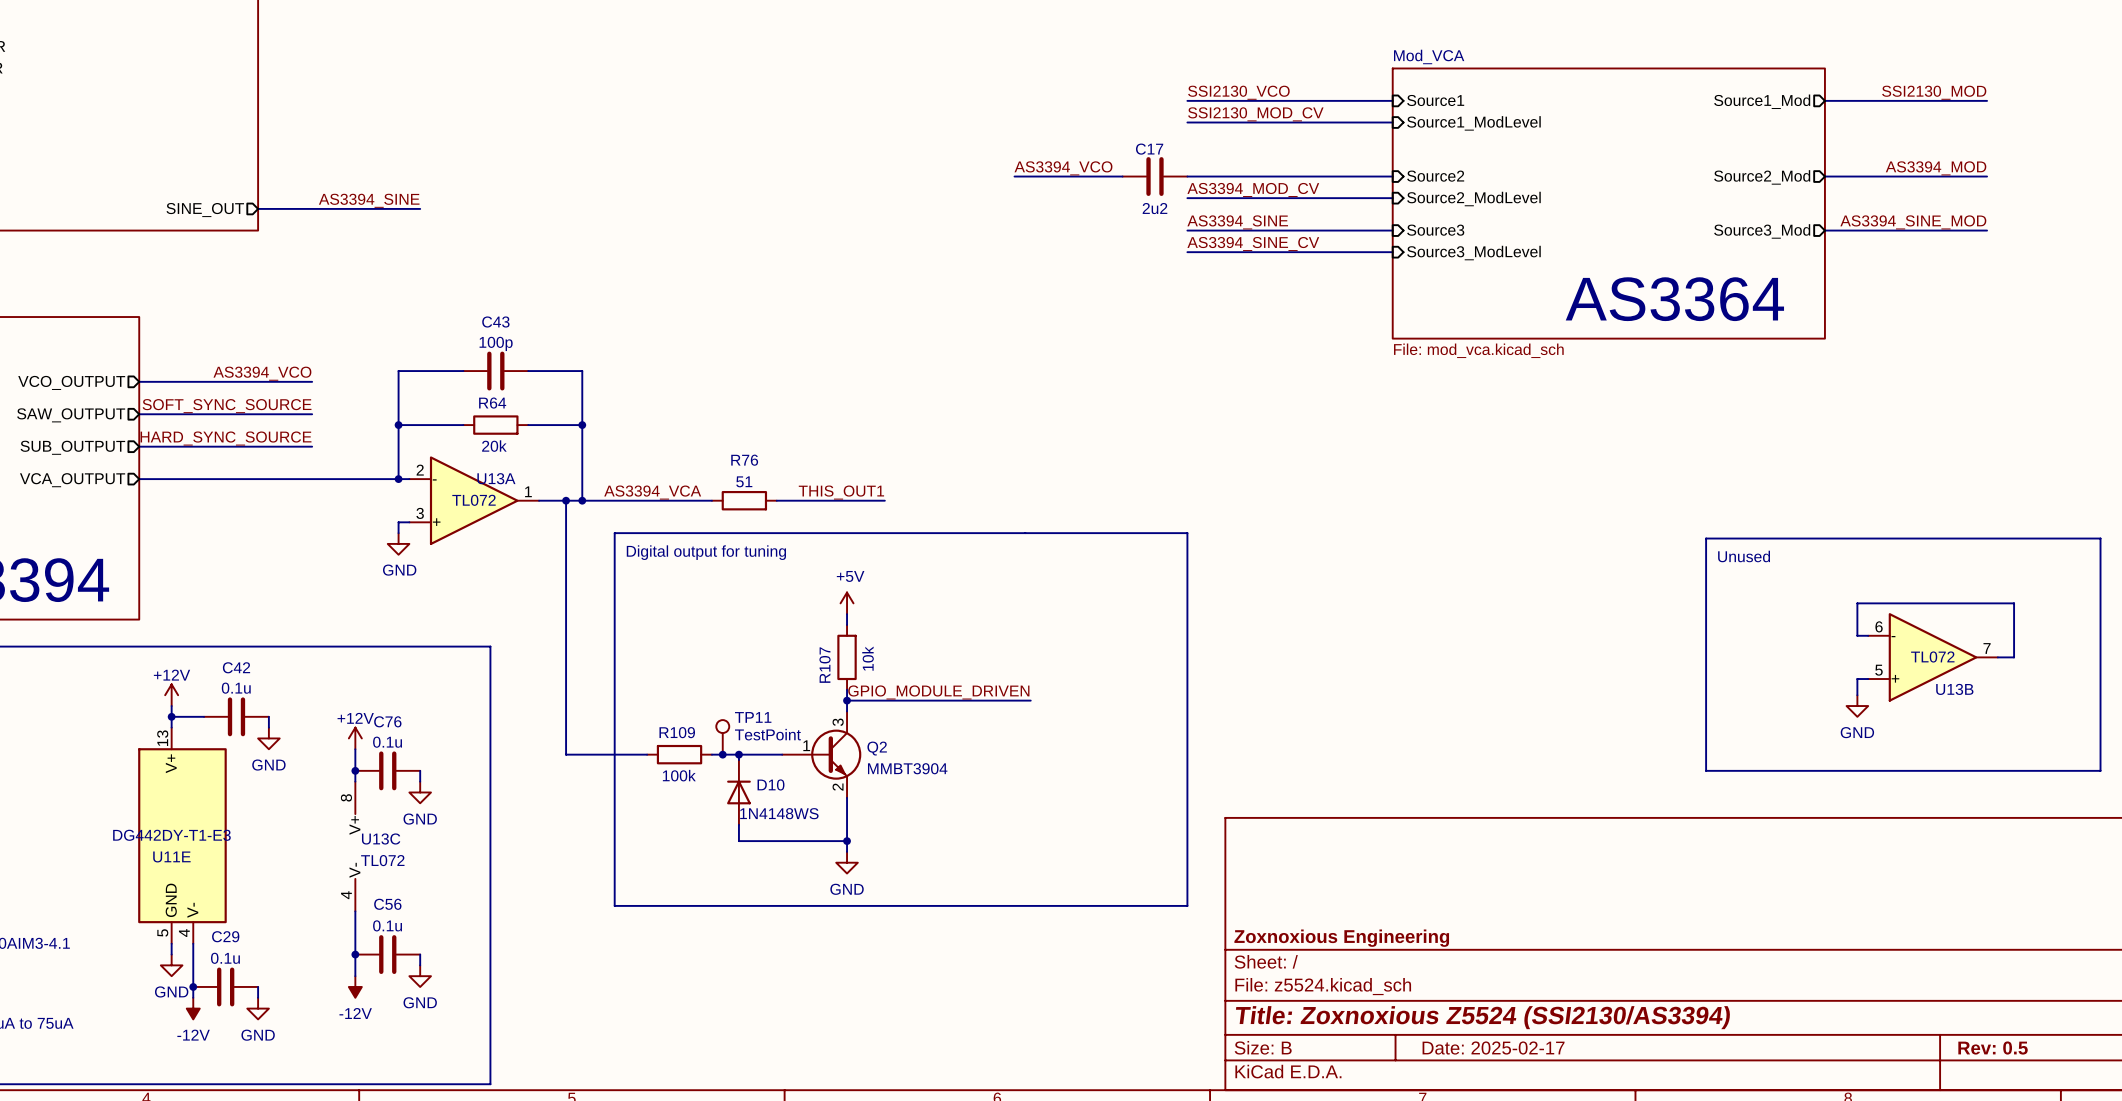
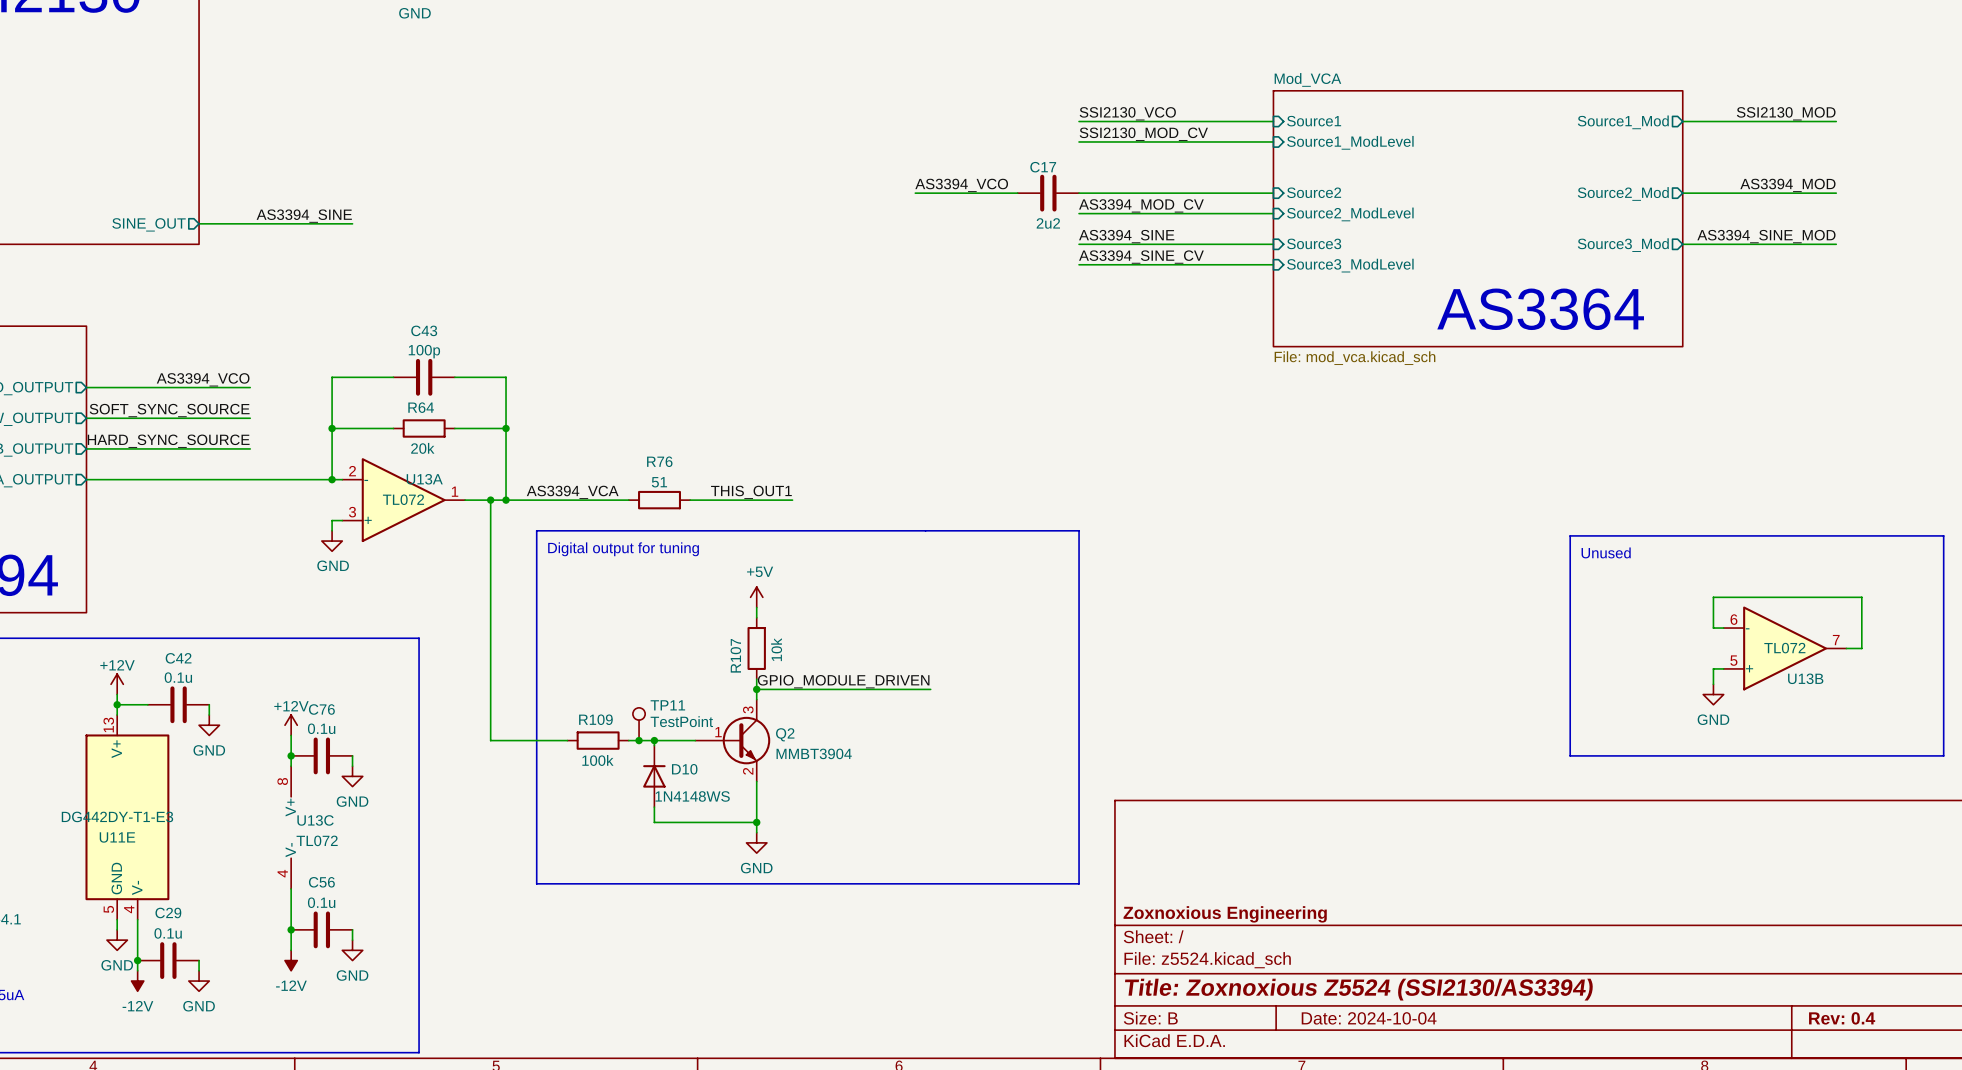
title block: Date: 2025-02-17 (1493, 1048) -> Date: 2024-10-04 (1369, 1018)
title block: Rev: 0.5 (1993, 1048) -> Rev: 0.4 (1842, 1018)

